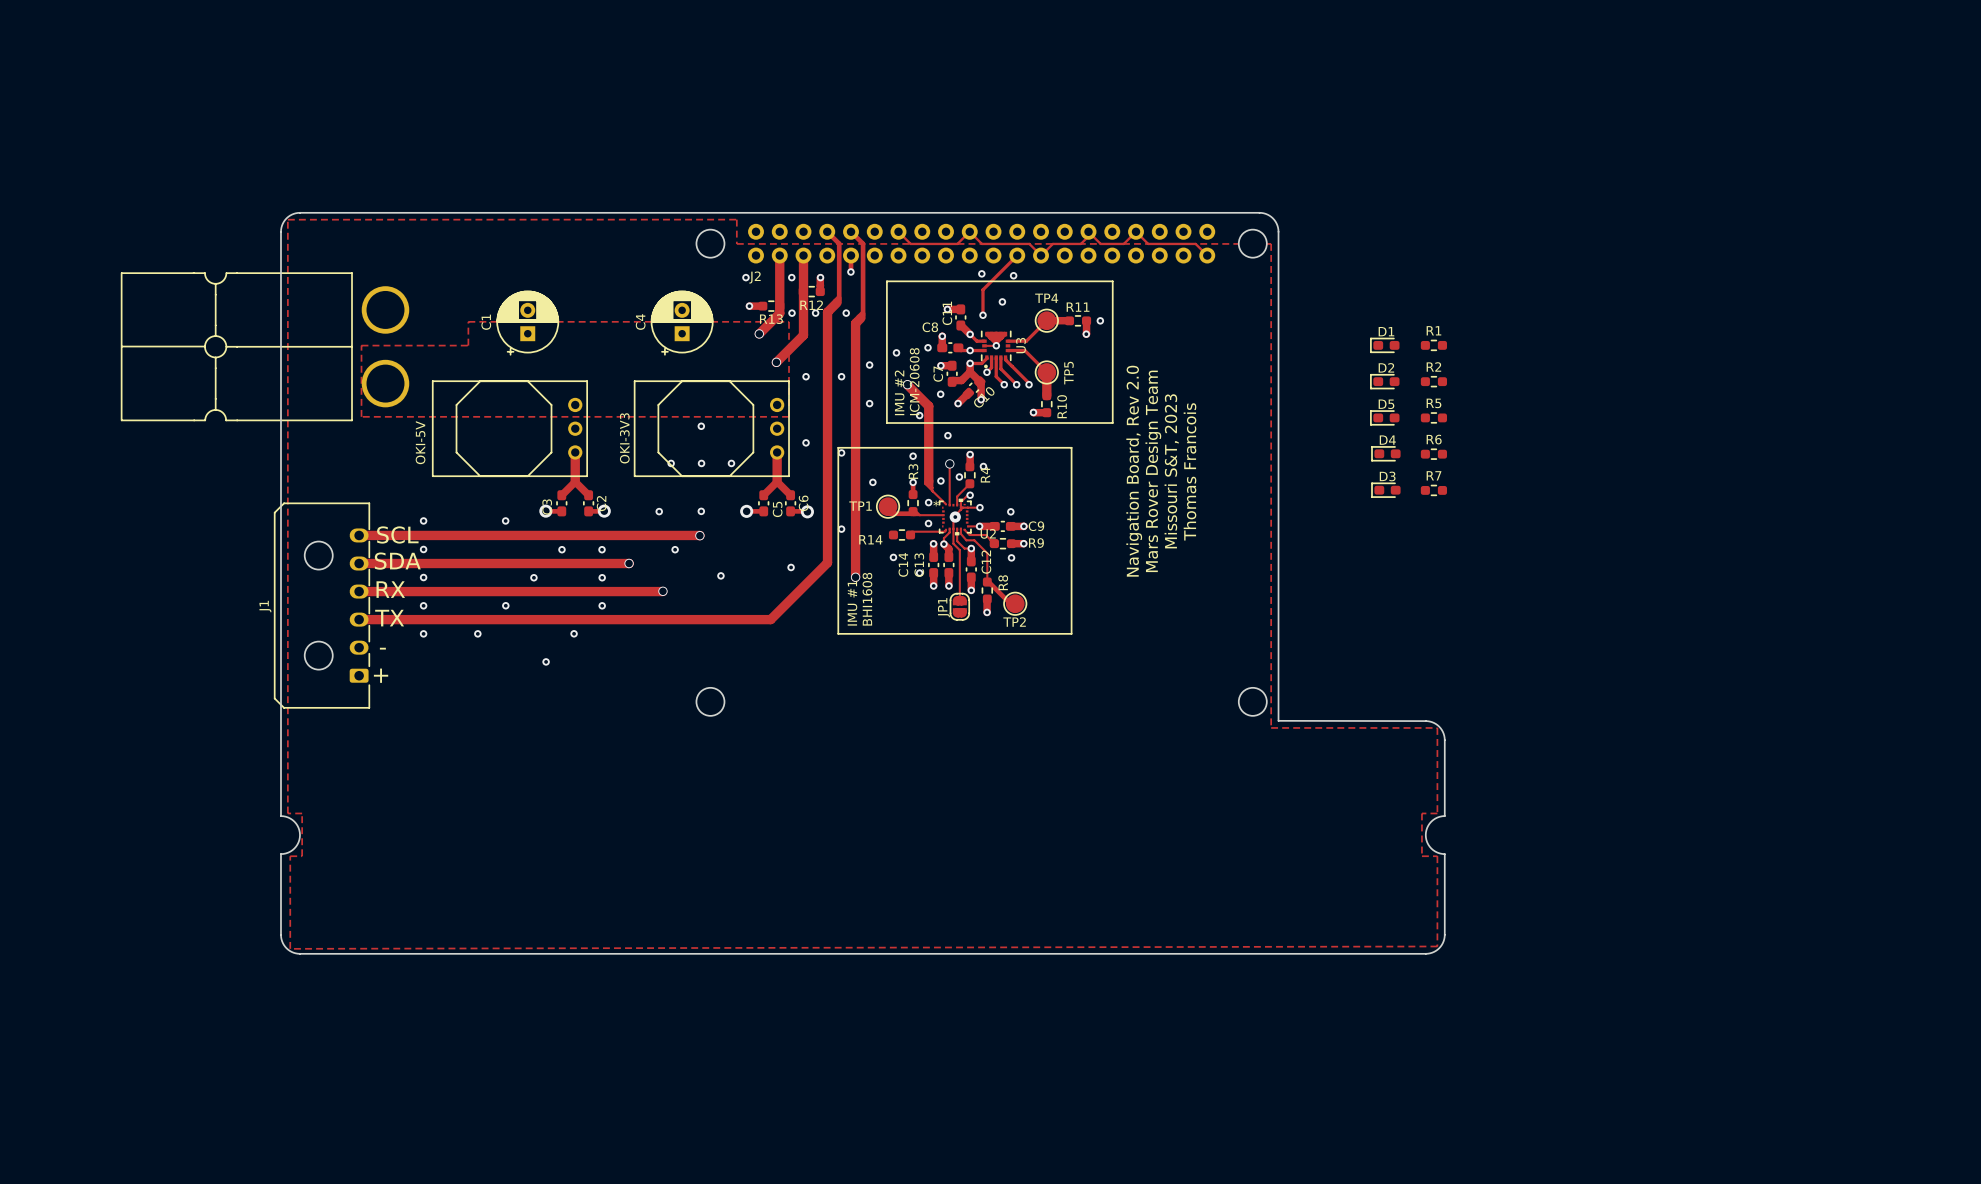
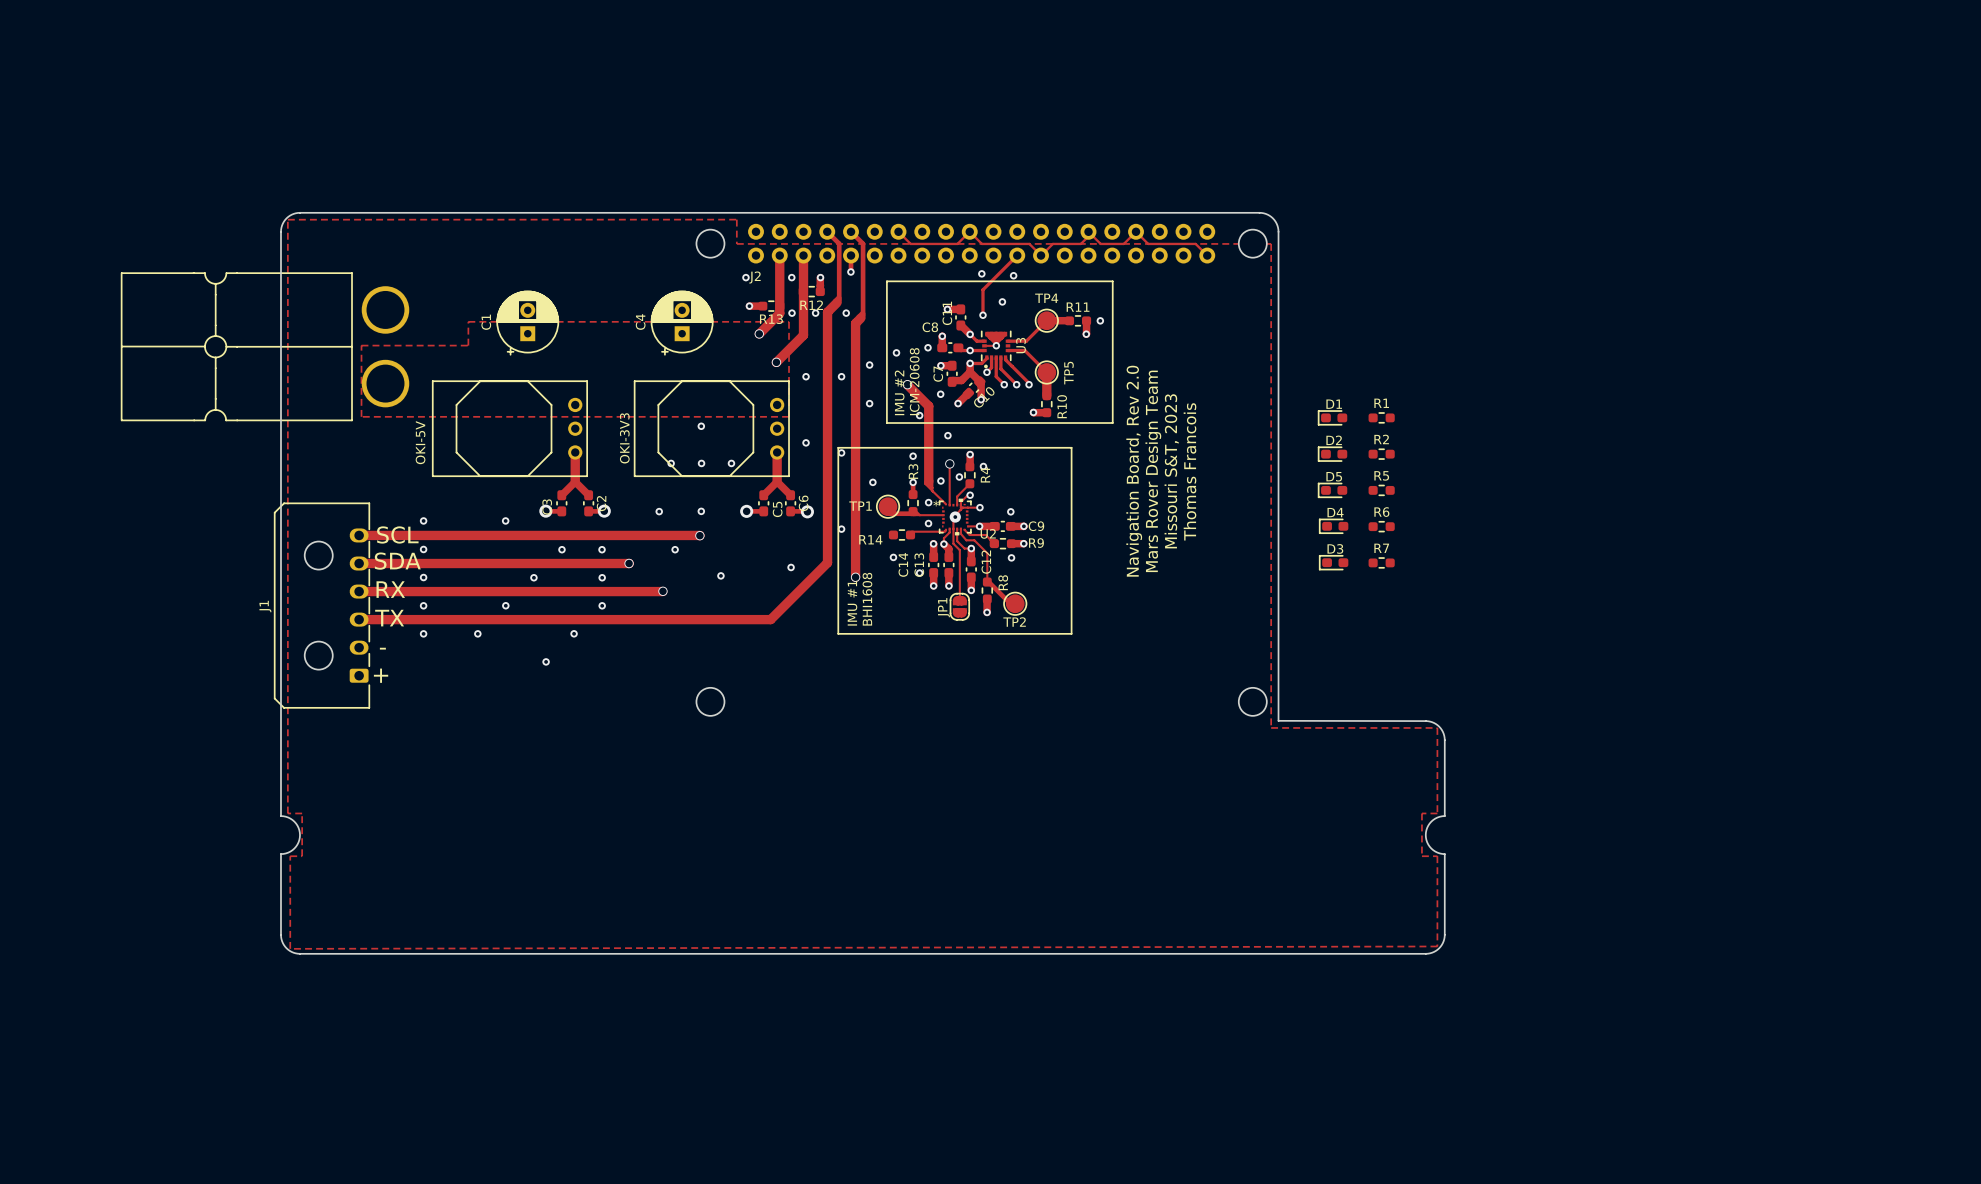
D1 position: (1384, 345) -> (1332, 417)
R1 position: (1433, 345) -> (1381, 417)
D2 position: (1384, 381) -> (1332, 454)
R2 position: (1433, 381) -> (1381, 454)
D5 position: (1384, 417) -> (1332, 490)
R5 position: (1433, 417) -> (1381, 490)
D4 position: (1386, 453) -> (1333, 526)
R6 position: (1433, 454) -> (1381, 526)
D3 position: (1386, 490) -> (1333, 562)
R7 position: (1433, 490) -> (1381, 562)

